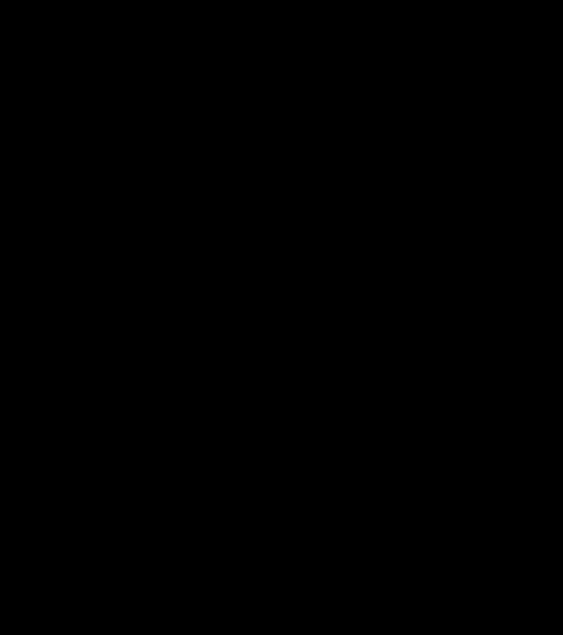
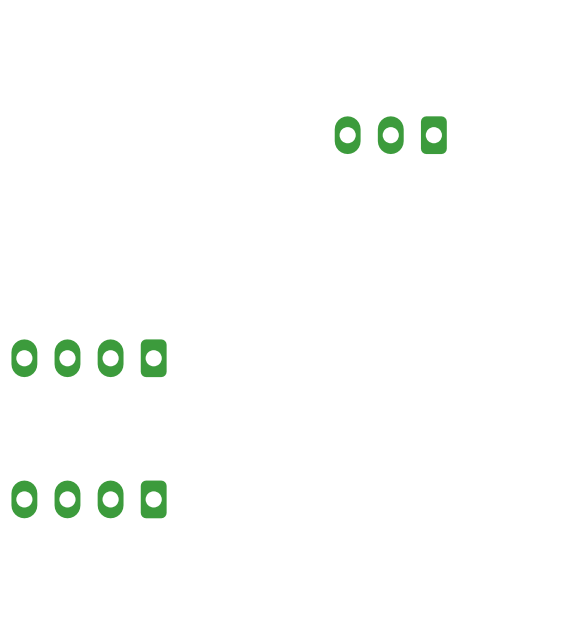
part: none -> (390, 135)
part: none -> (89, 358)
part: none -> (89, 499)

